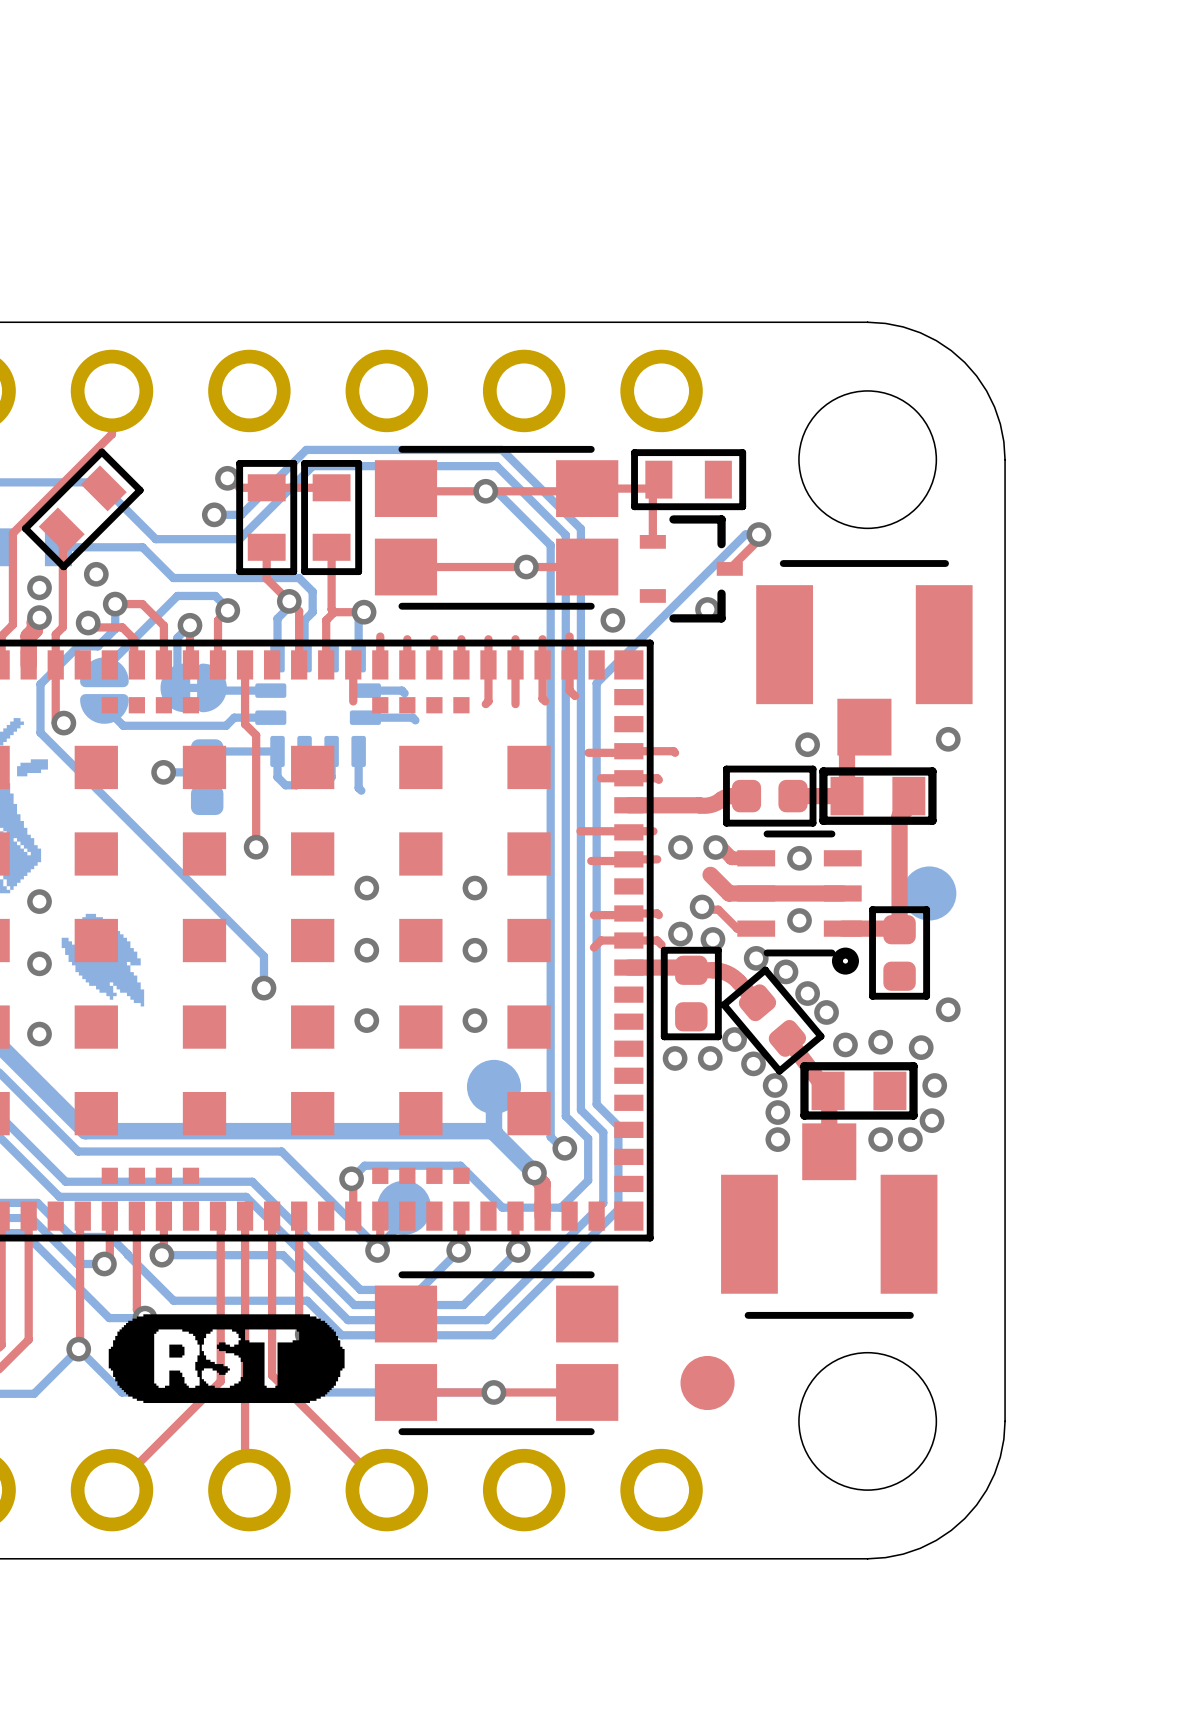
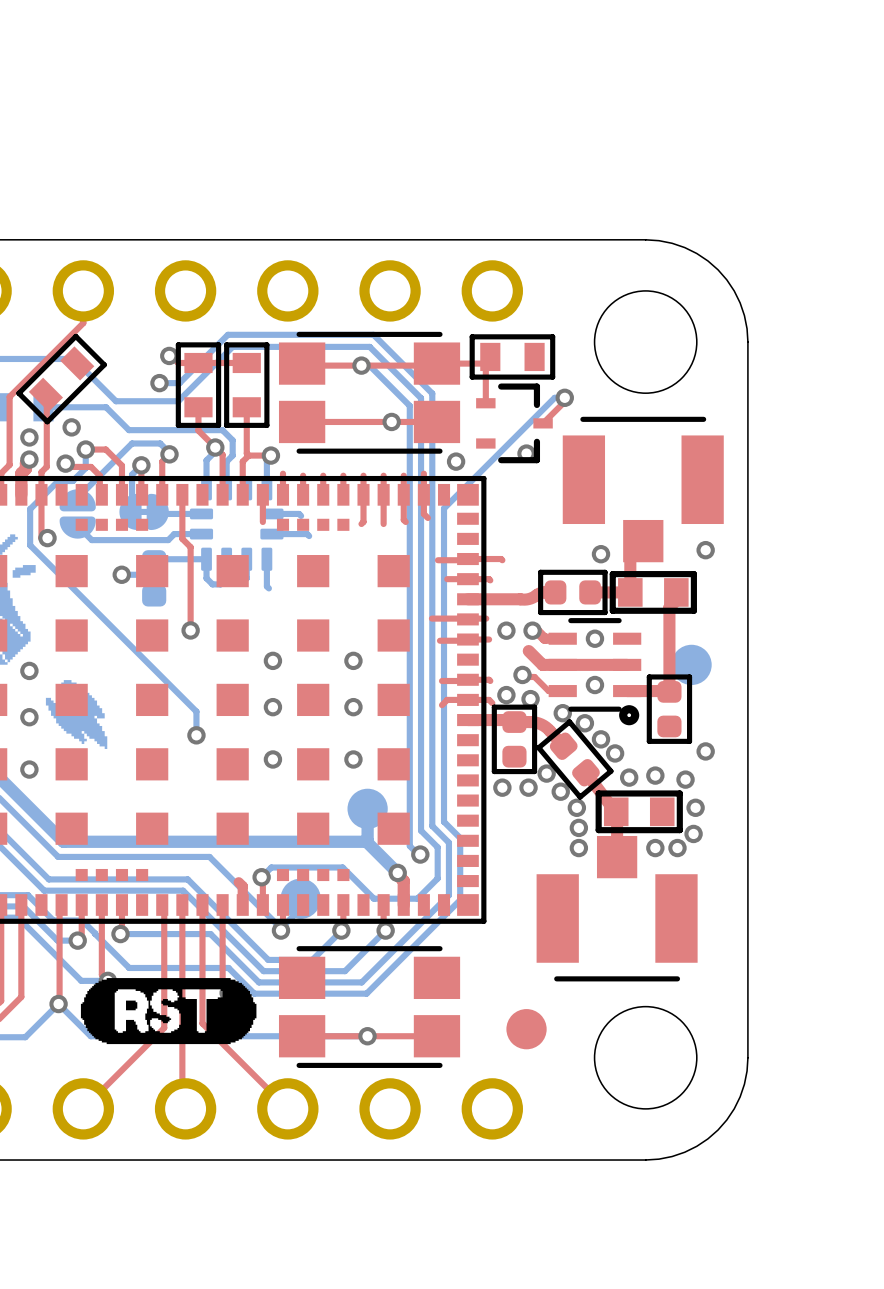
top track: none -> (238, 882) (242, 886) (242, 904)

